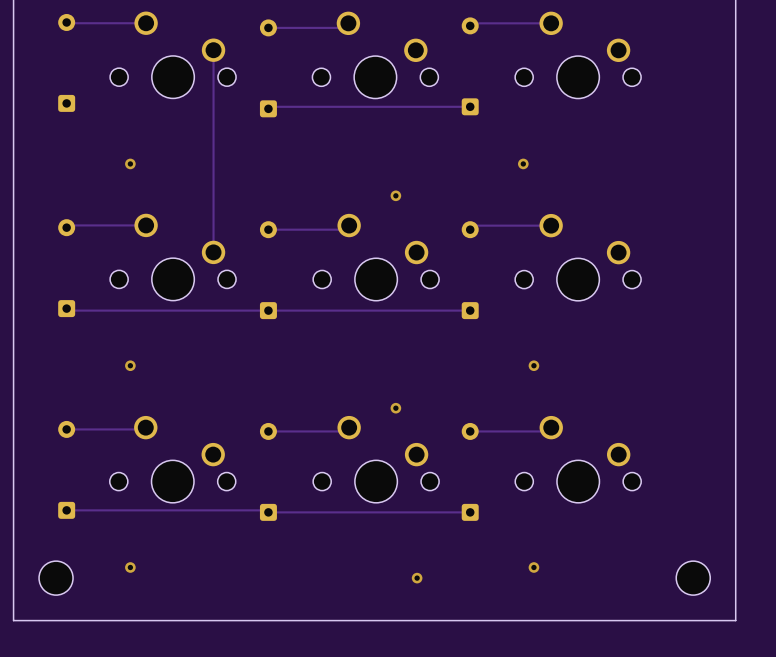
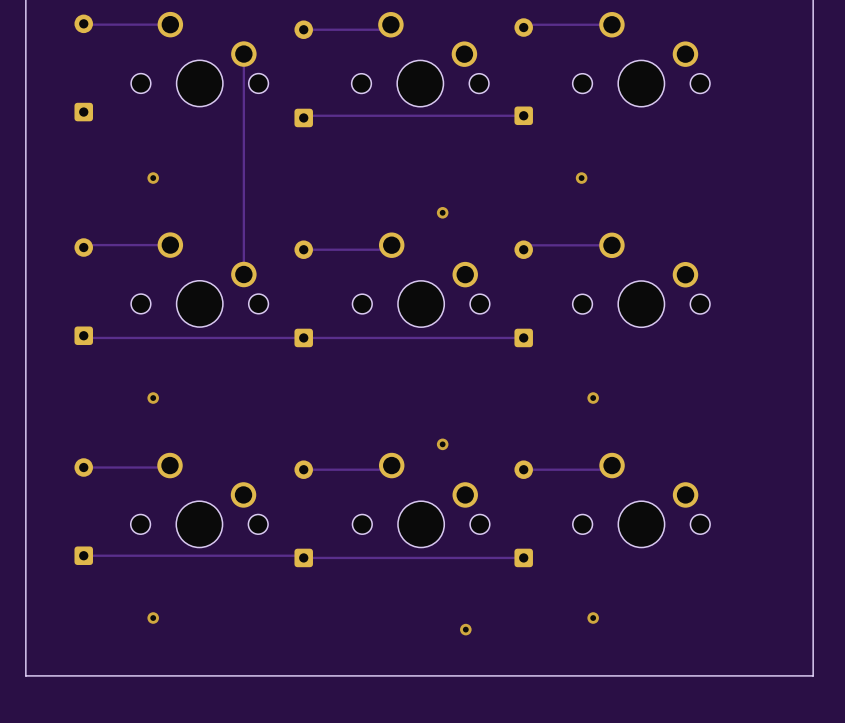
part: (56, 578) -> none
part: (693, 578) -> none

